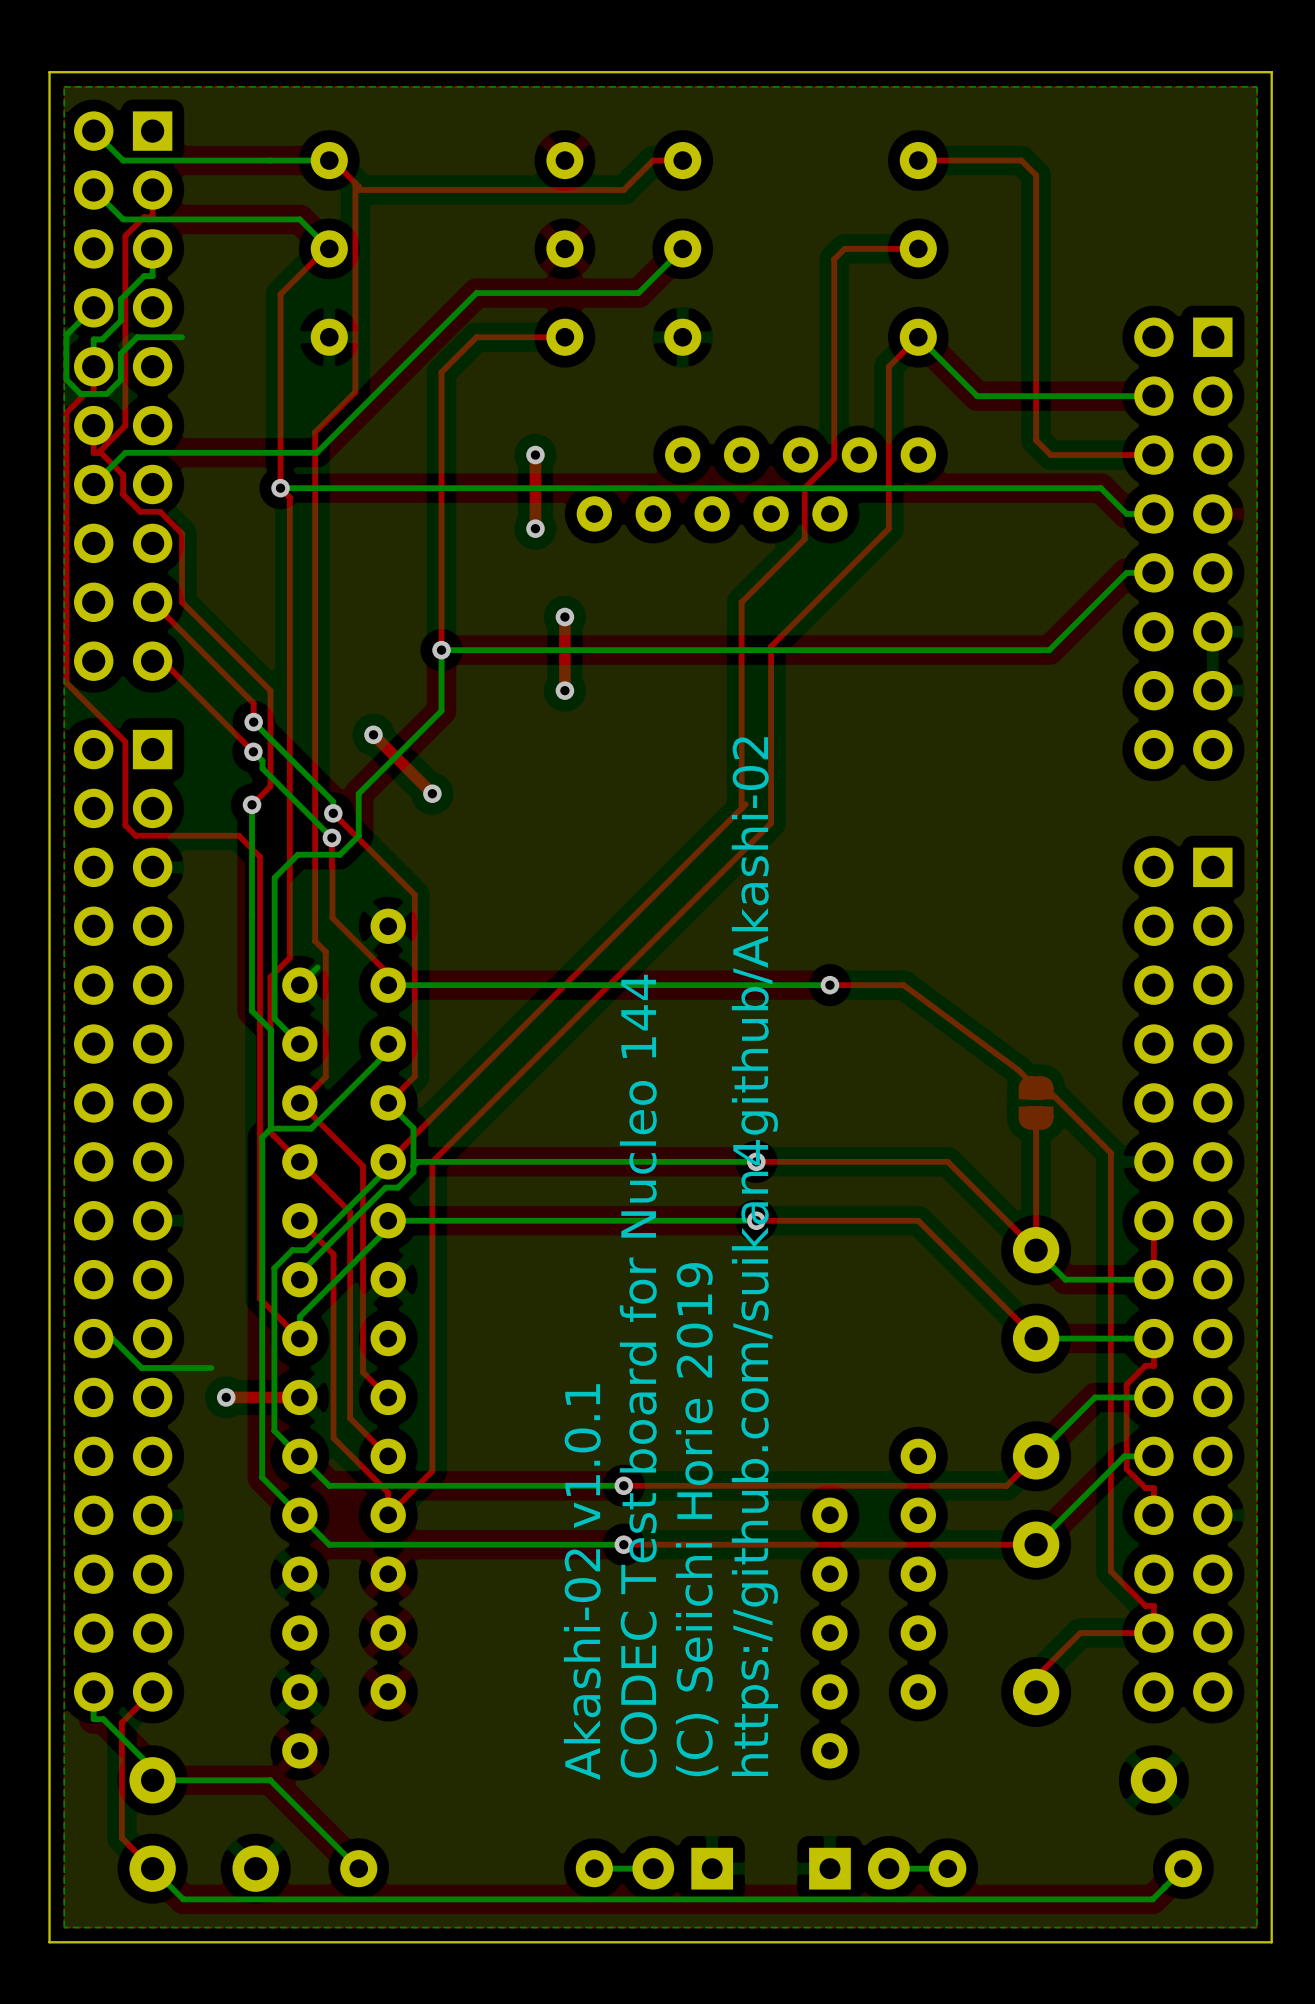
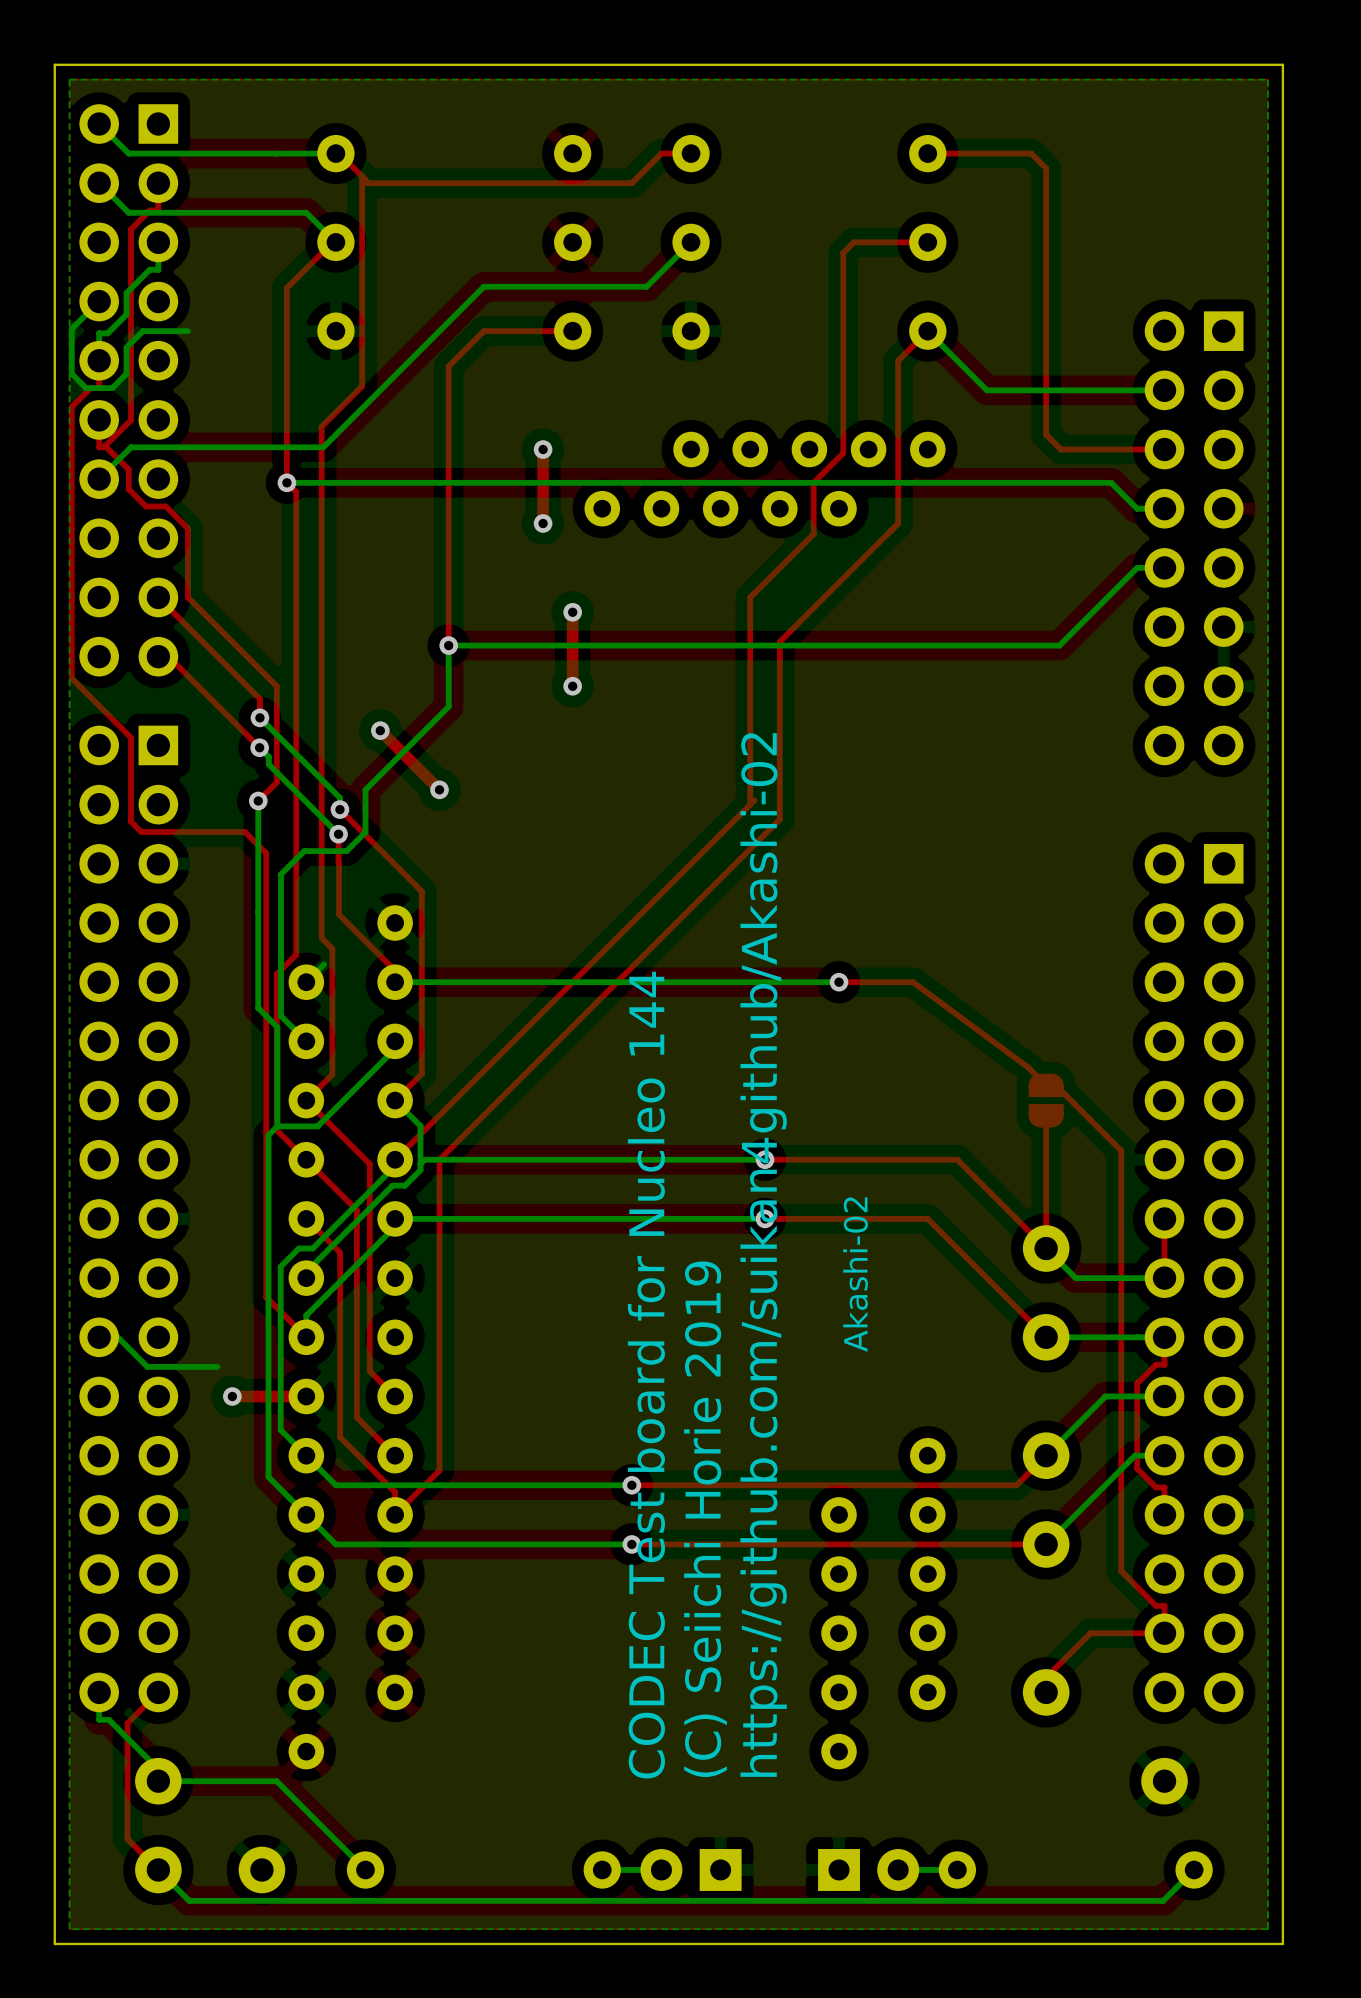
text: none -> Akashi-02 (855, 1274)
text: Akashi-02 v1.0.1 (582, 1582) -> none

